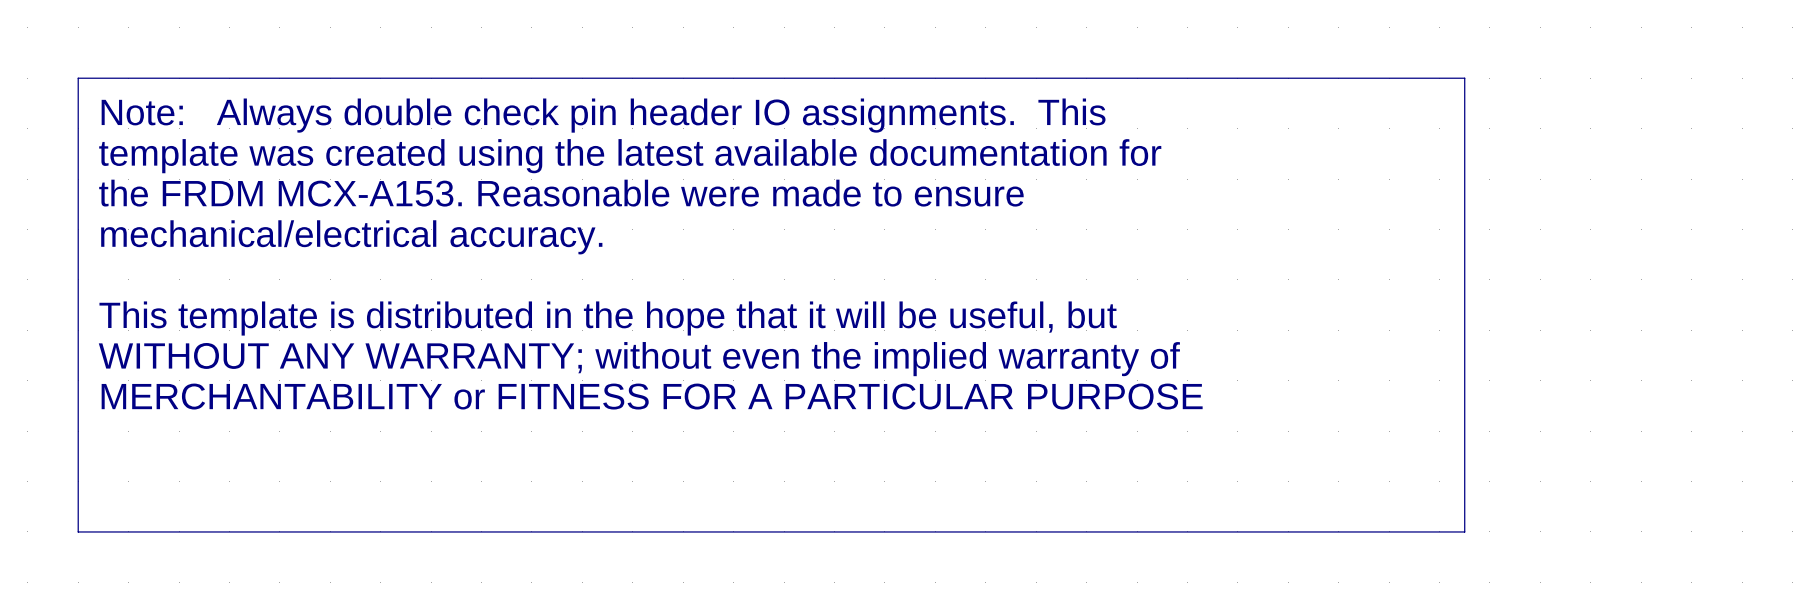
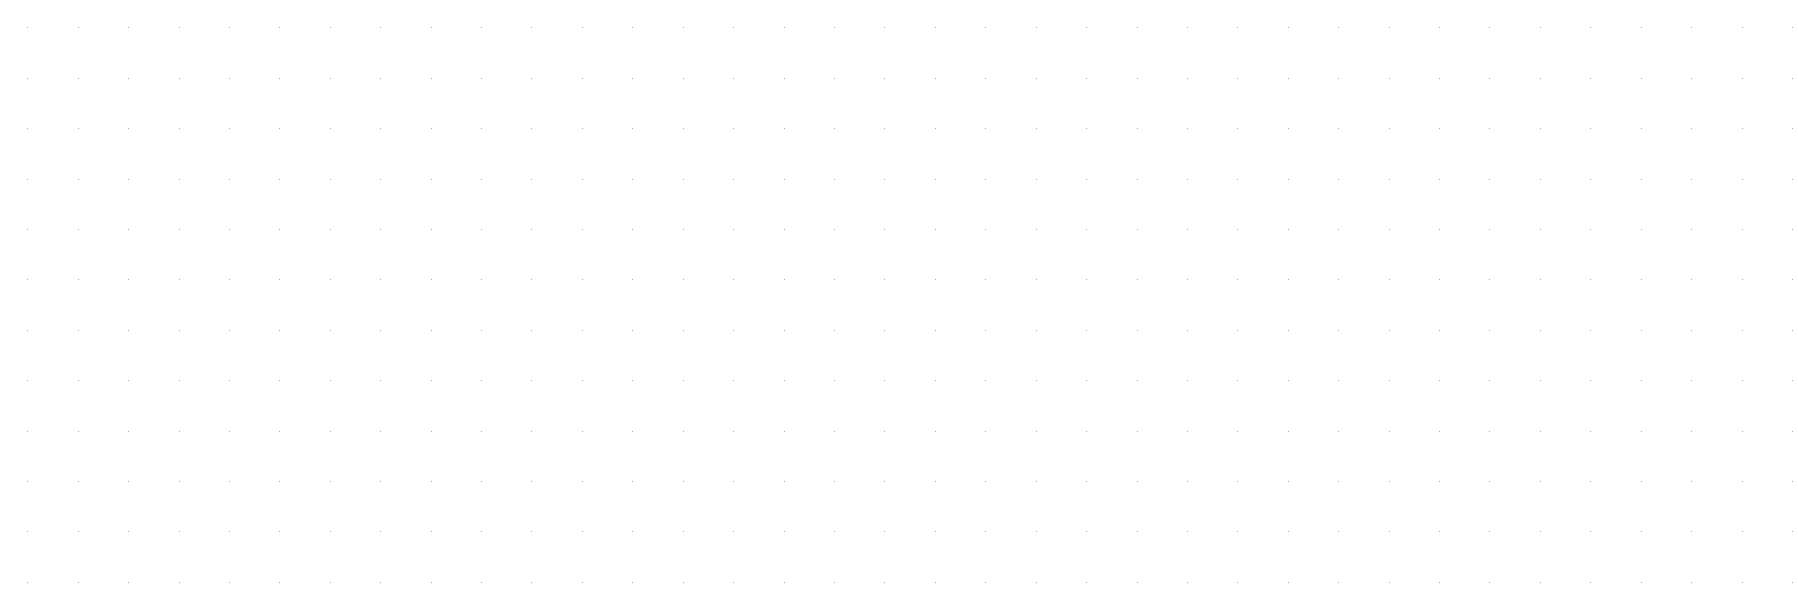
line: (78, 78) (1464, 78) (1464, 531) (78, 531) (78, 78) -> none
text: Note: Always double check pin header IO assignments. This (603, 115) -> none
text: template was created using the latest available documentation for (630, 156) -> none
text: the FRDM MCX-A153. Reasonable were made to ensure (561, 193) -> none
text: mechanical/electrical accuracy. (351, 237) -> none
text: This template is distributed in the hope that it will be useful, but (608, 318) -> none
text: WITHOUT ANY WARRANTY; without even the implied warranty of (639, 359) -> none
text: MERCHANTABILITY or FITNESS FOR A PARTICULAR PURPOSE (652, 396) -> none

